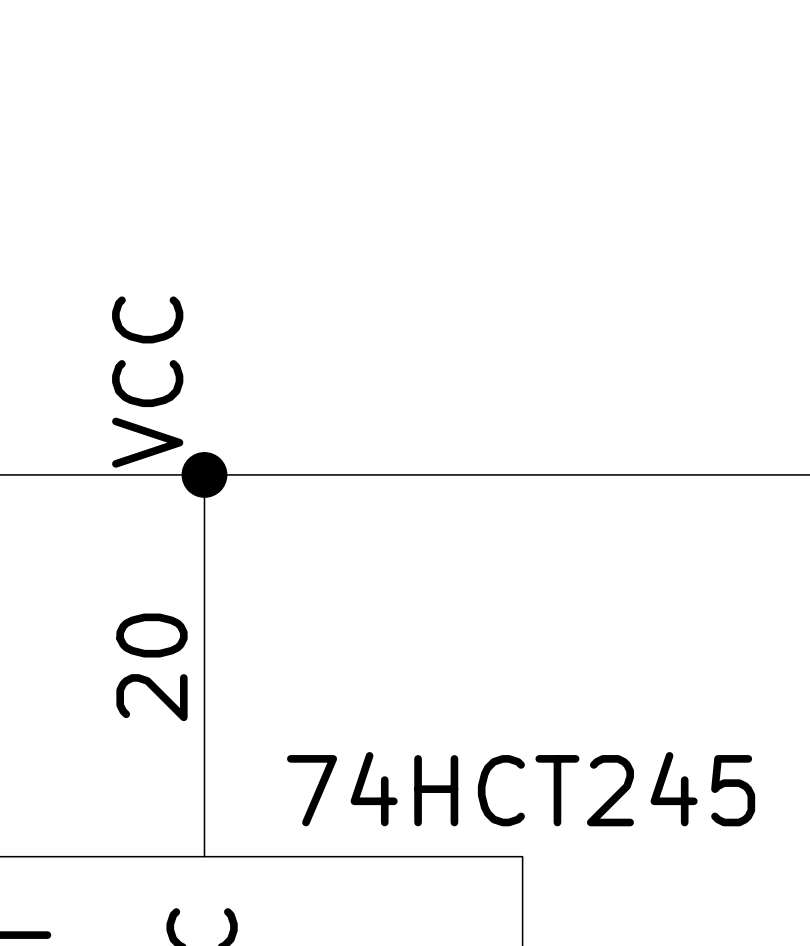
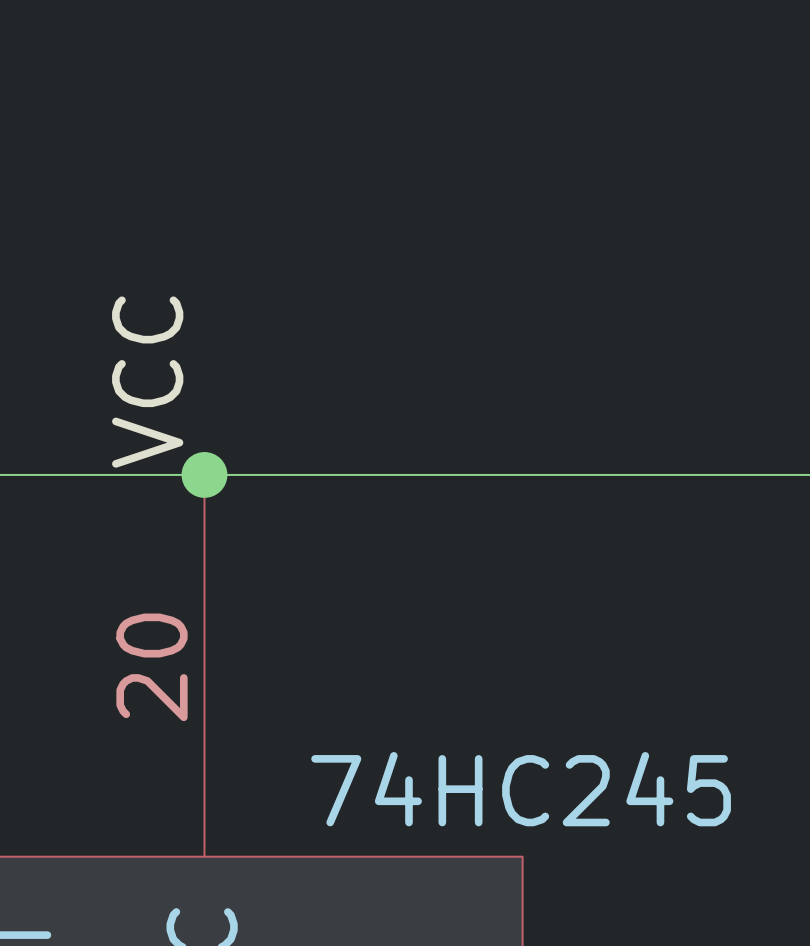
part value: 74HCT245 (521, 789) -> 74HC245 (521, 789)

